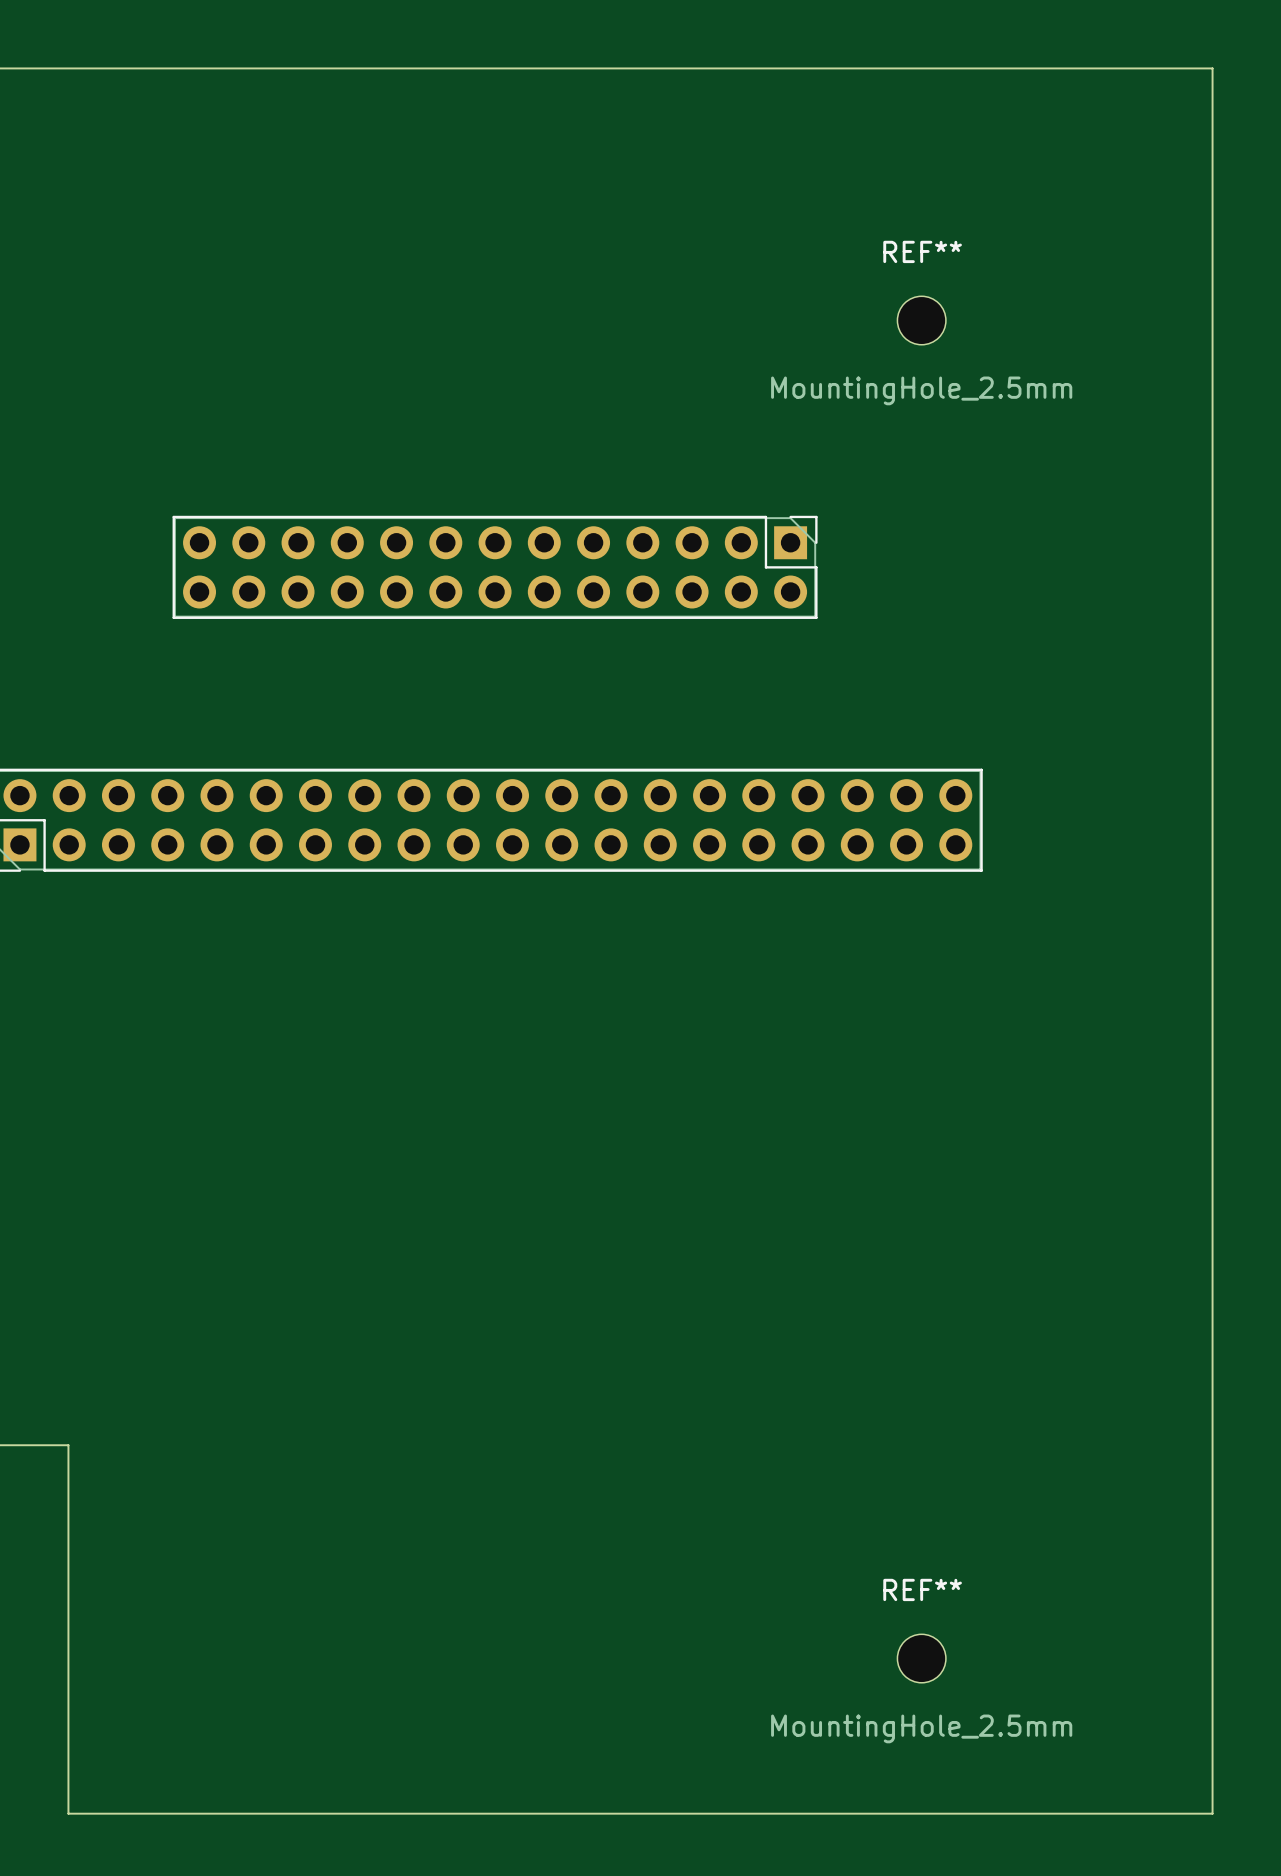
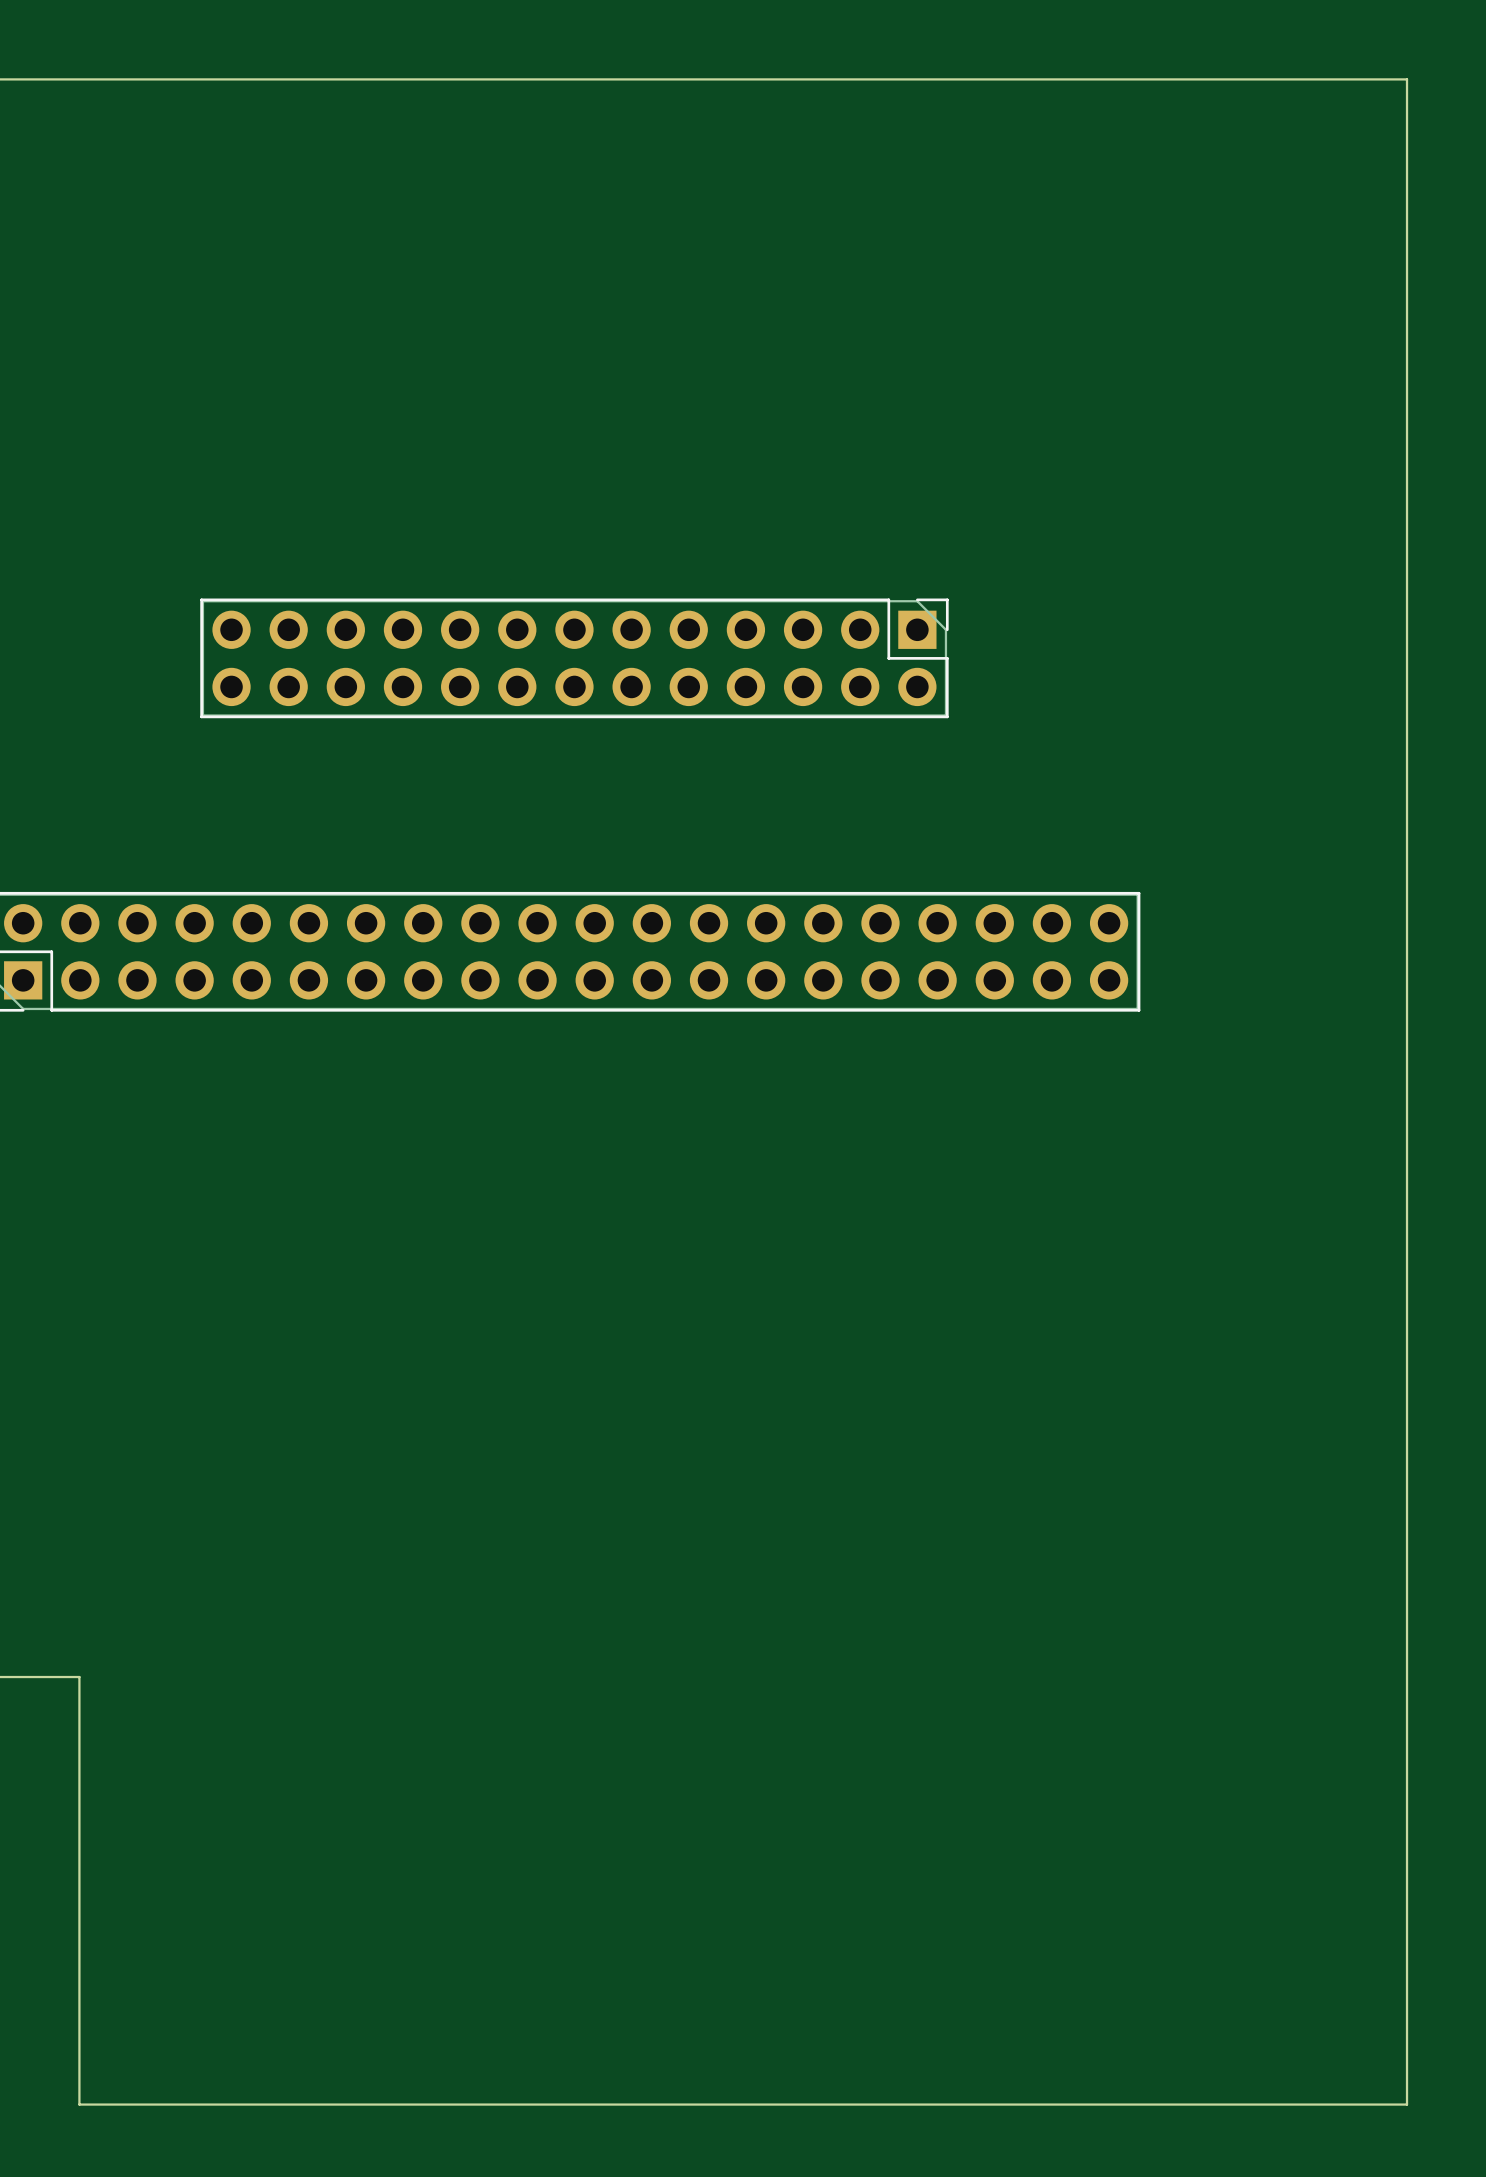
REF**: MountingHole_2.5mm (921, 320) -> none
REF**: MountingHole_2.5mm (921, 1658) -> none

